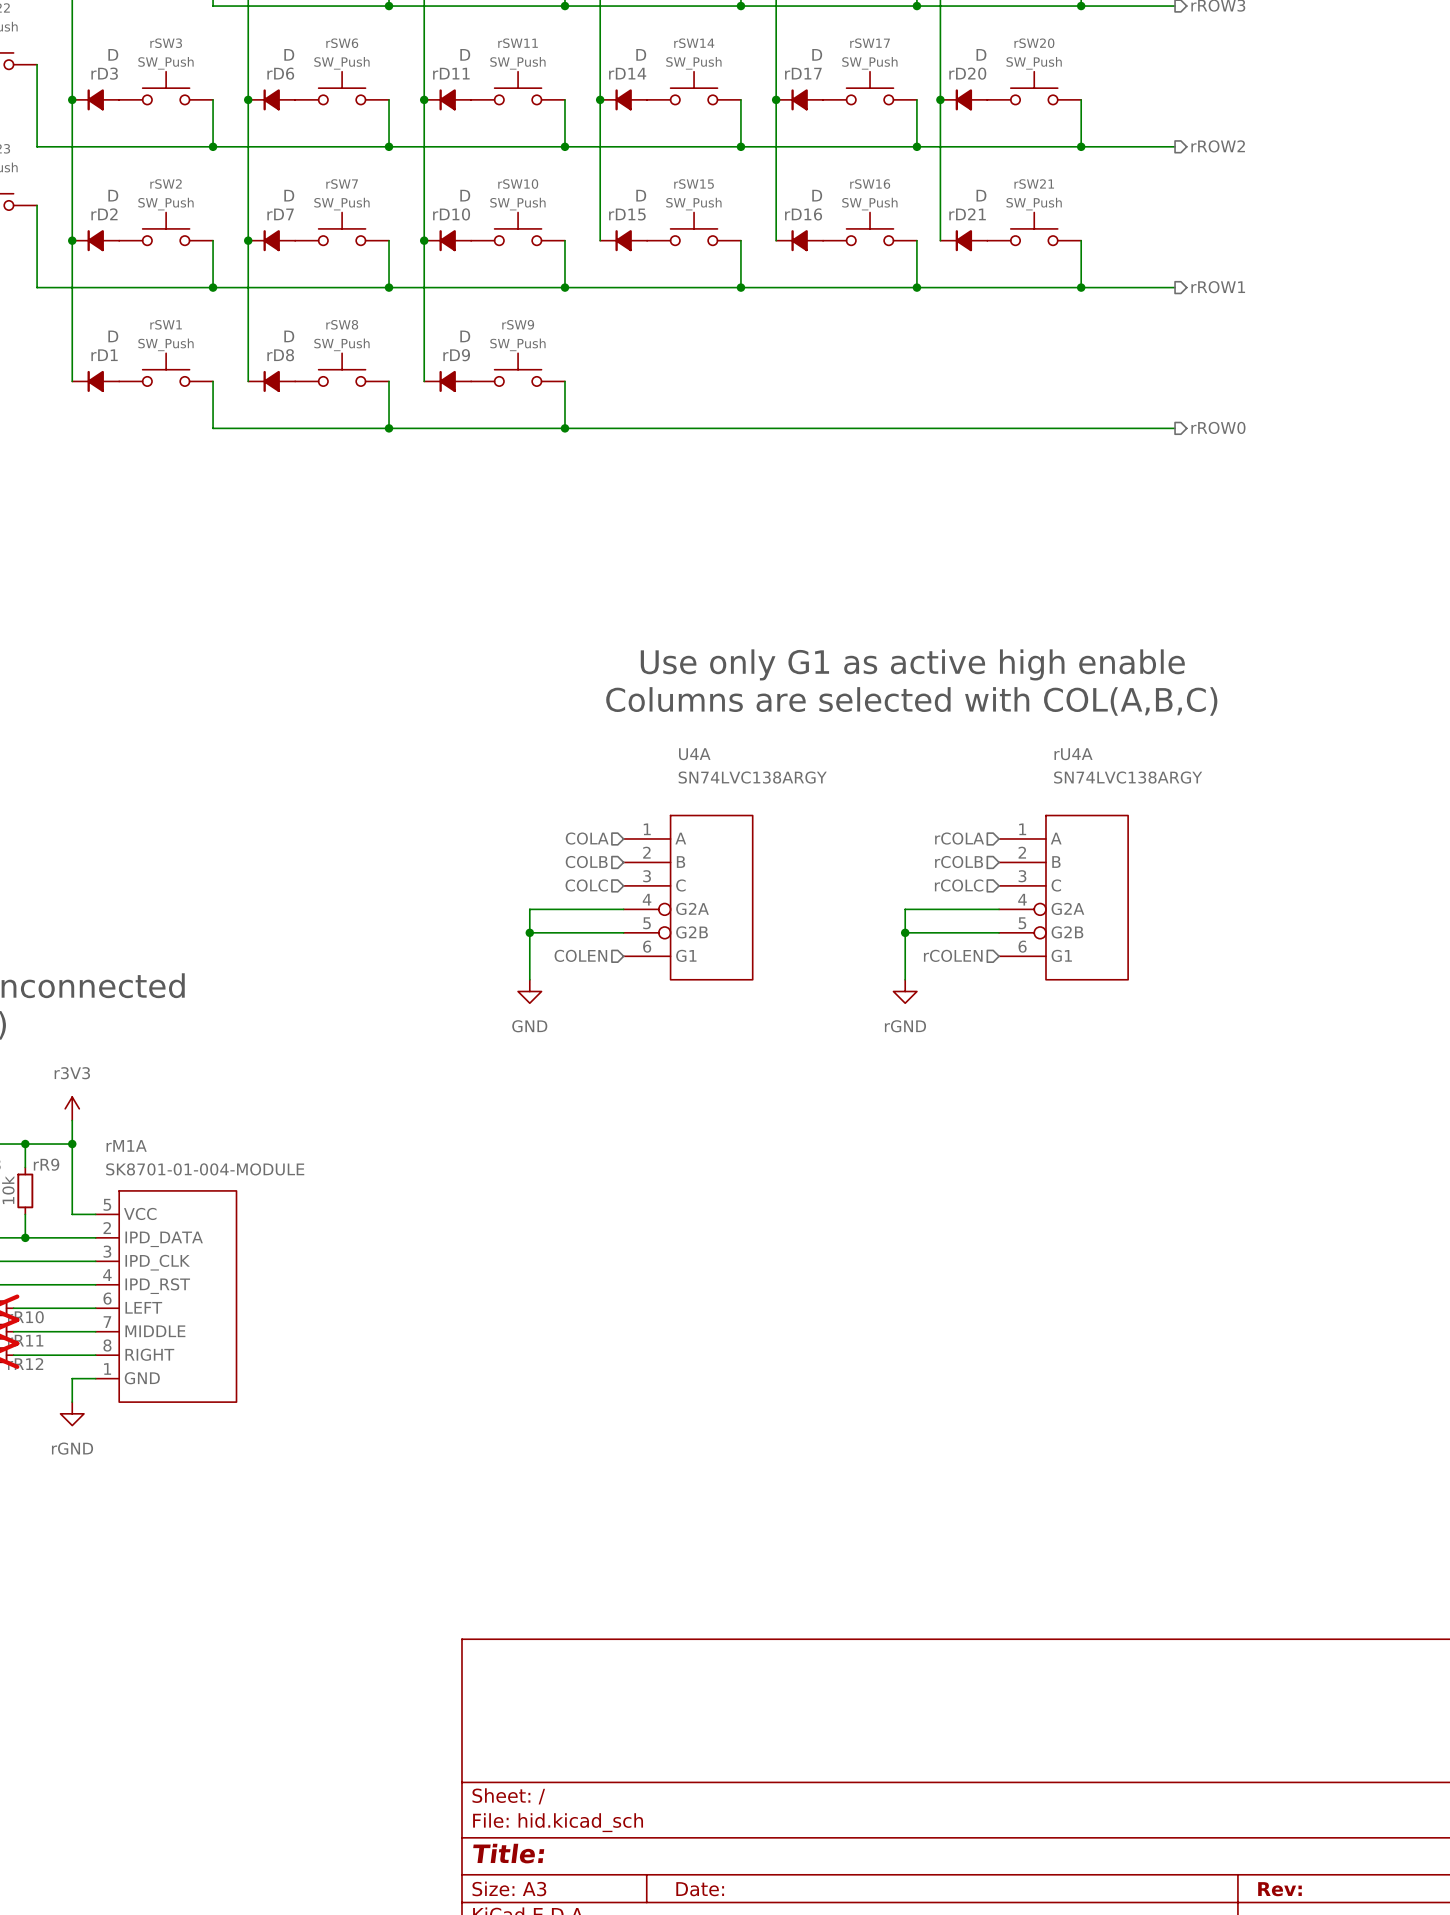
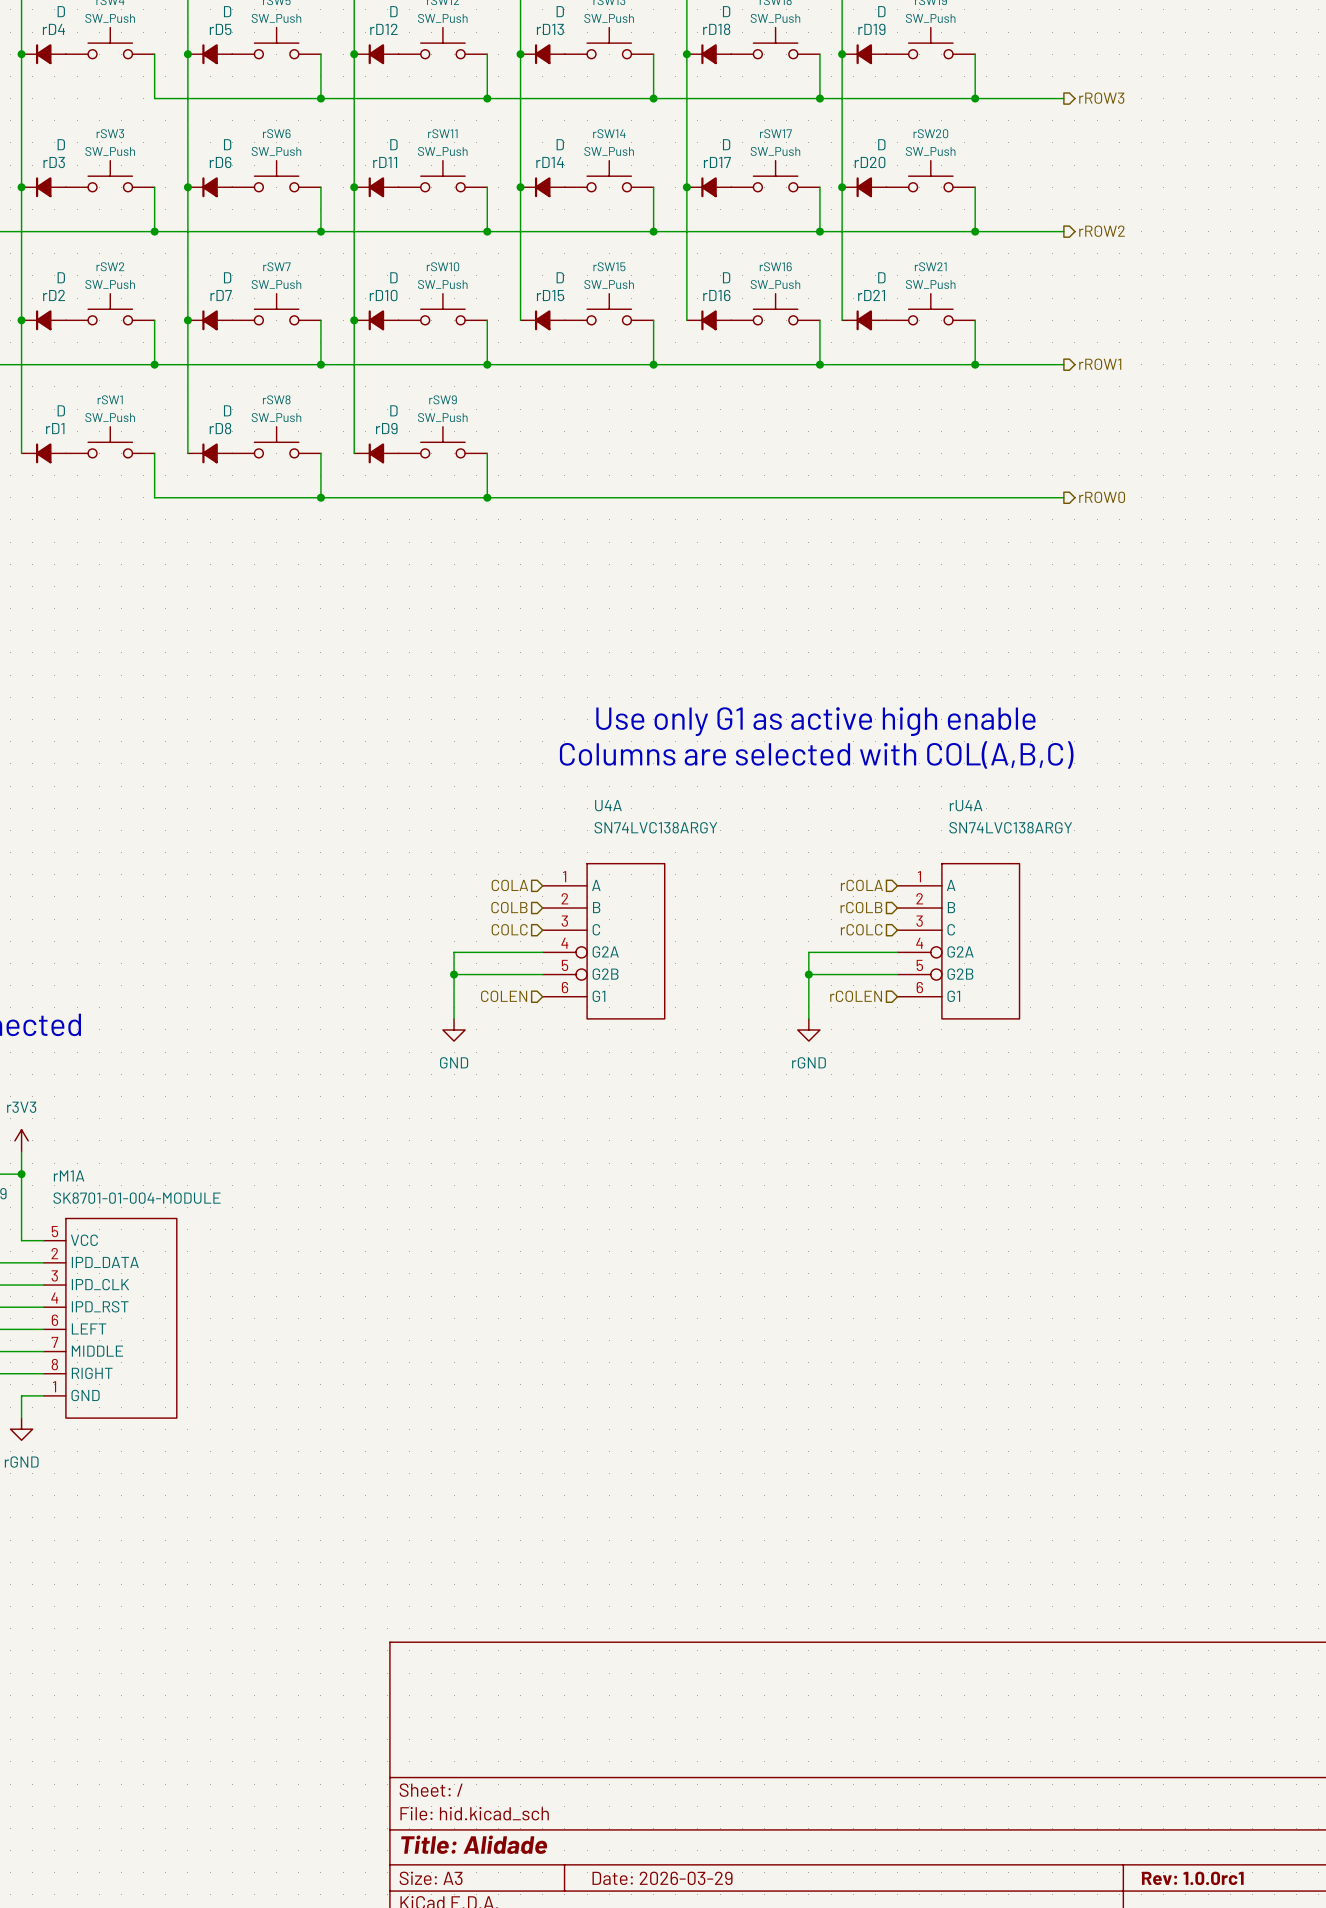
title block: Title: (508, 1853) -> Title: Alidade (474, 1844)
title block: Date: (700, 1889) -> Date: 2026-03-29 (662, 1878)
title block: Rev: (1279, 1889) -> Rev: 1.0.0rc1 (1192, 1878)

